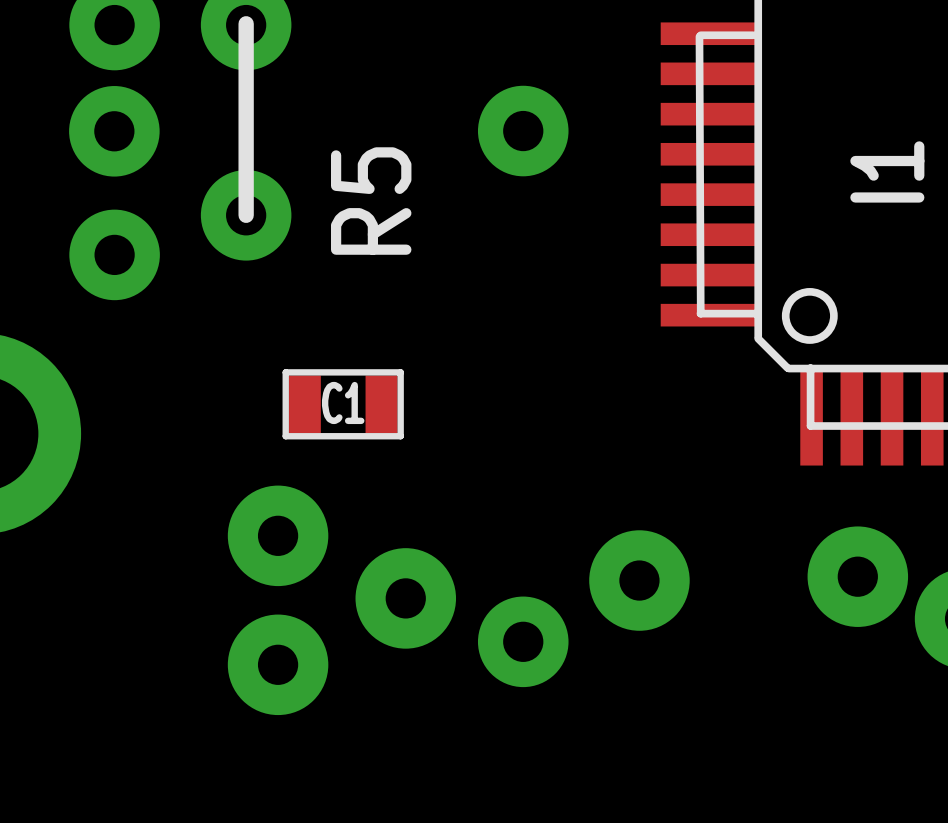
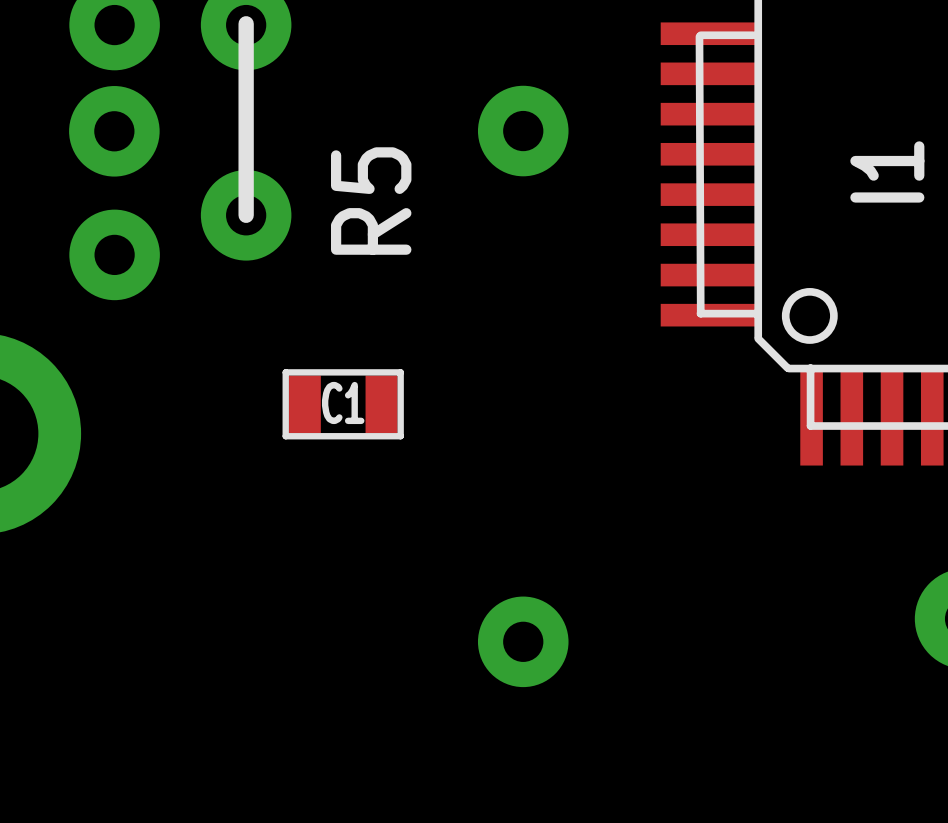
part: (748, 578) -> none
part: (341, 600) -> none

